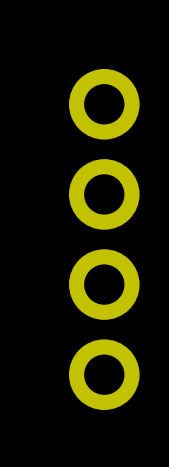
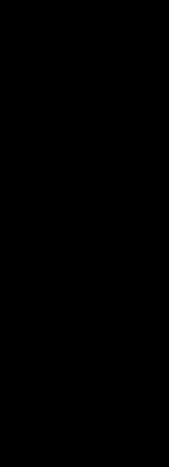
part: (104, 104) -> none
part: (104, 194) -> none
part: (104, 284) -> none
part: (104, 374) -> none

